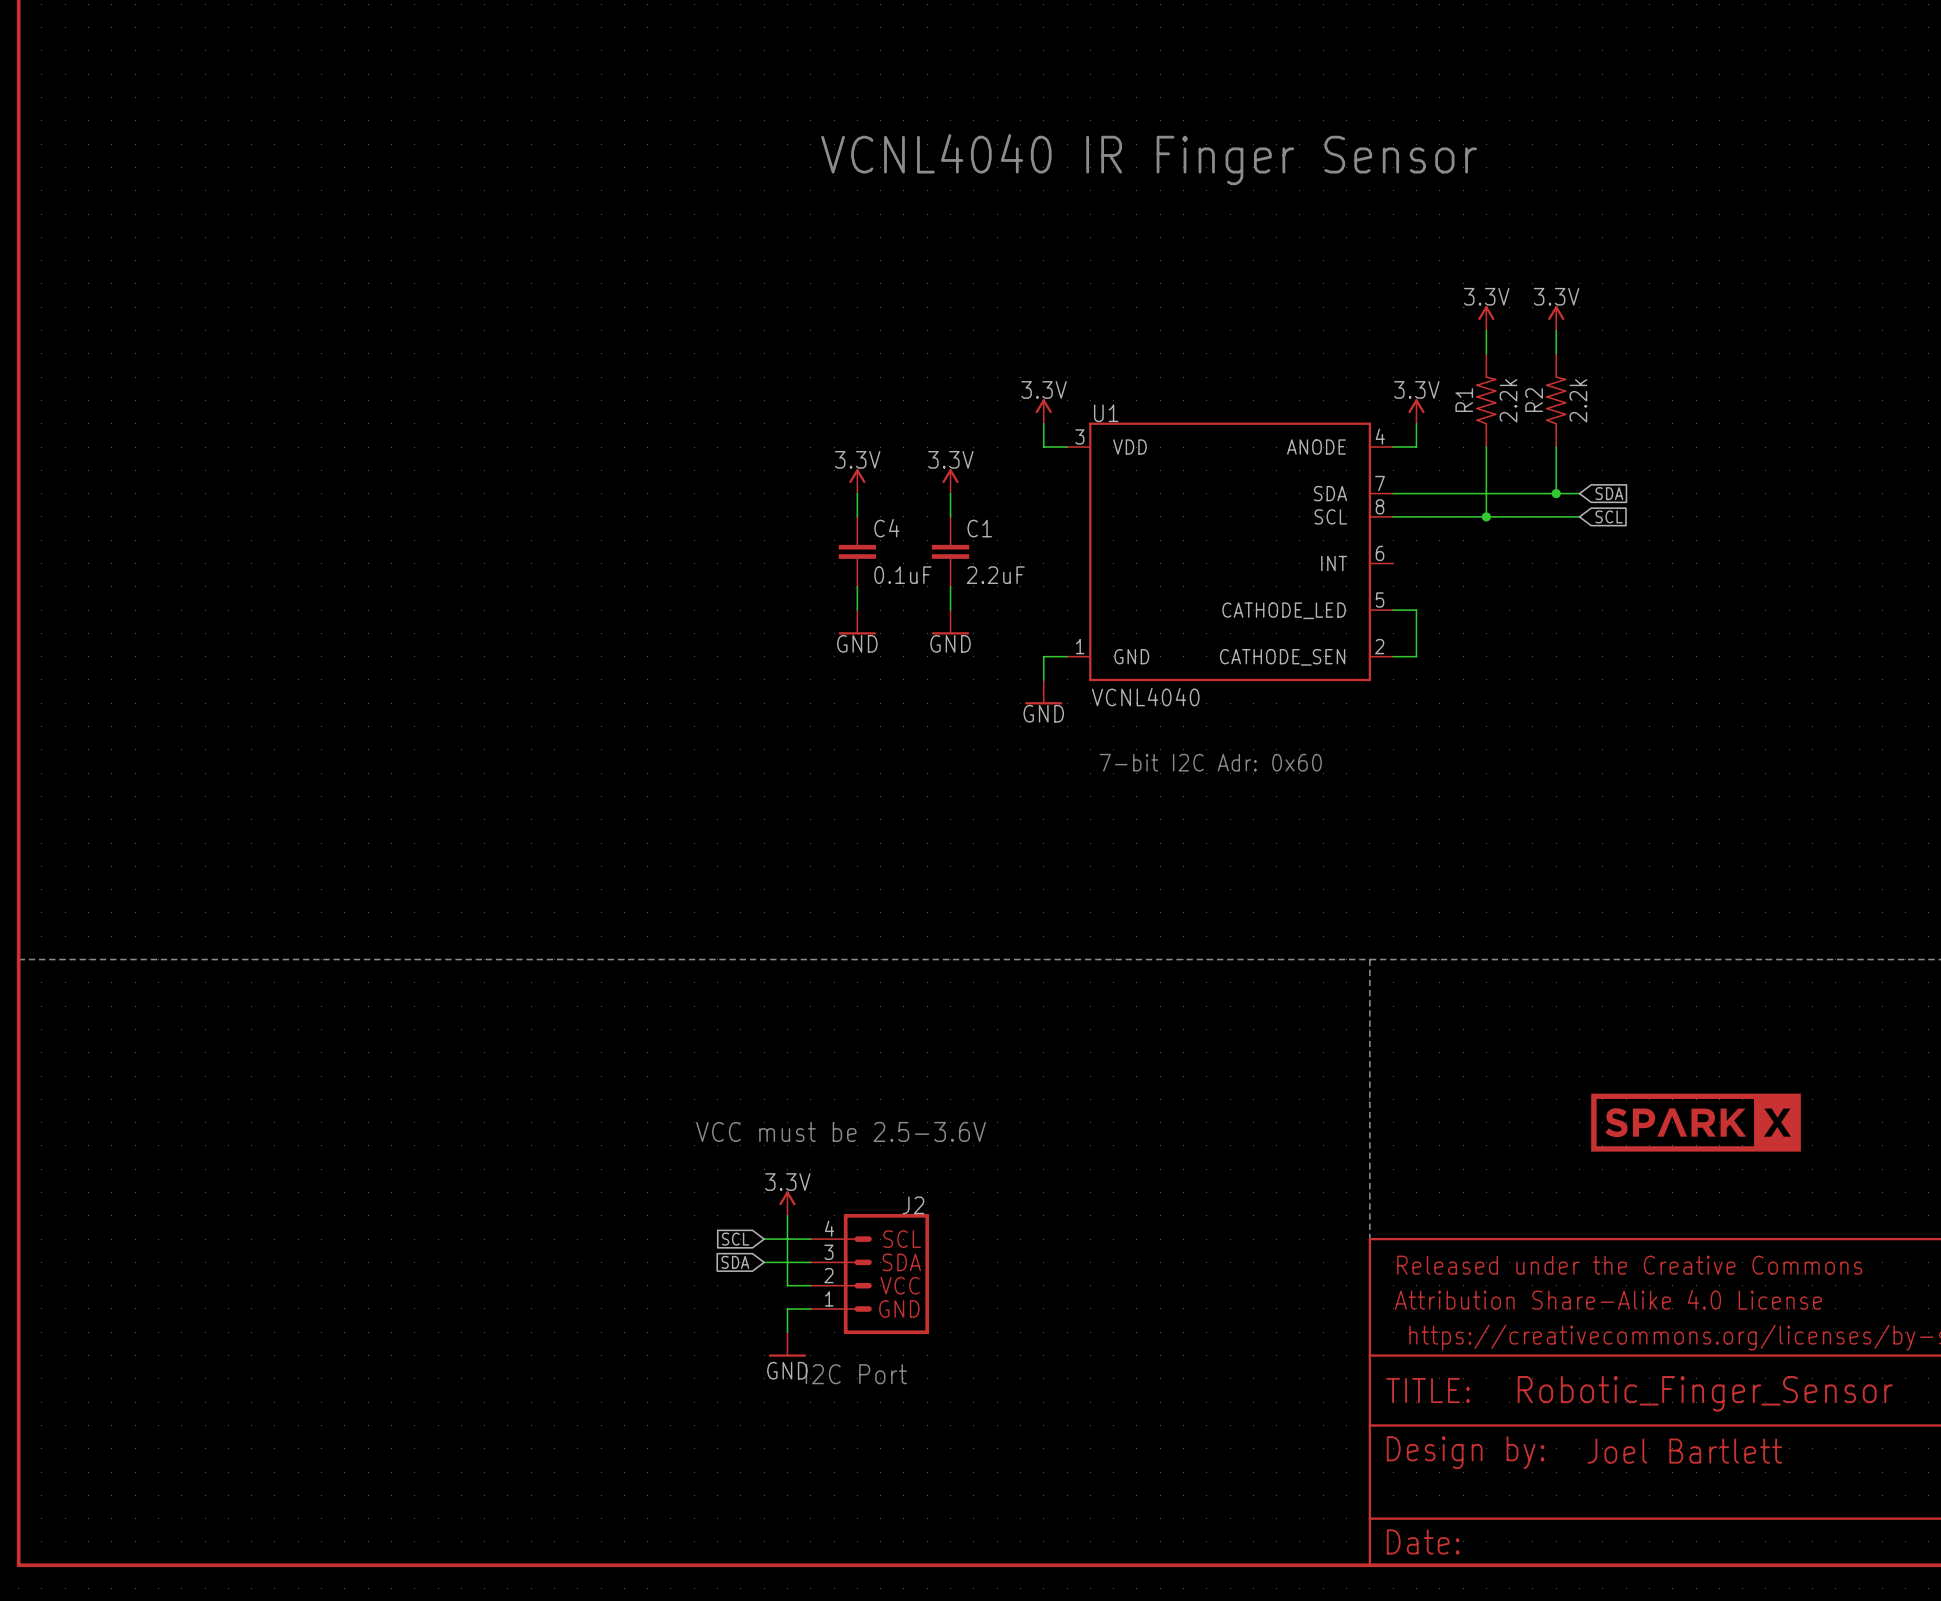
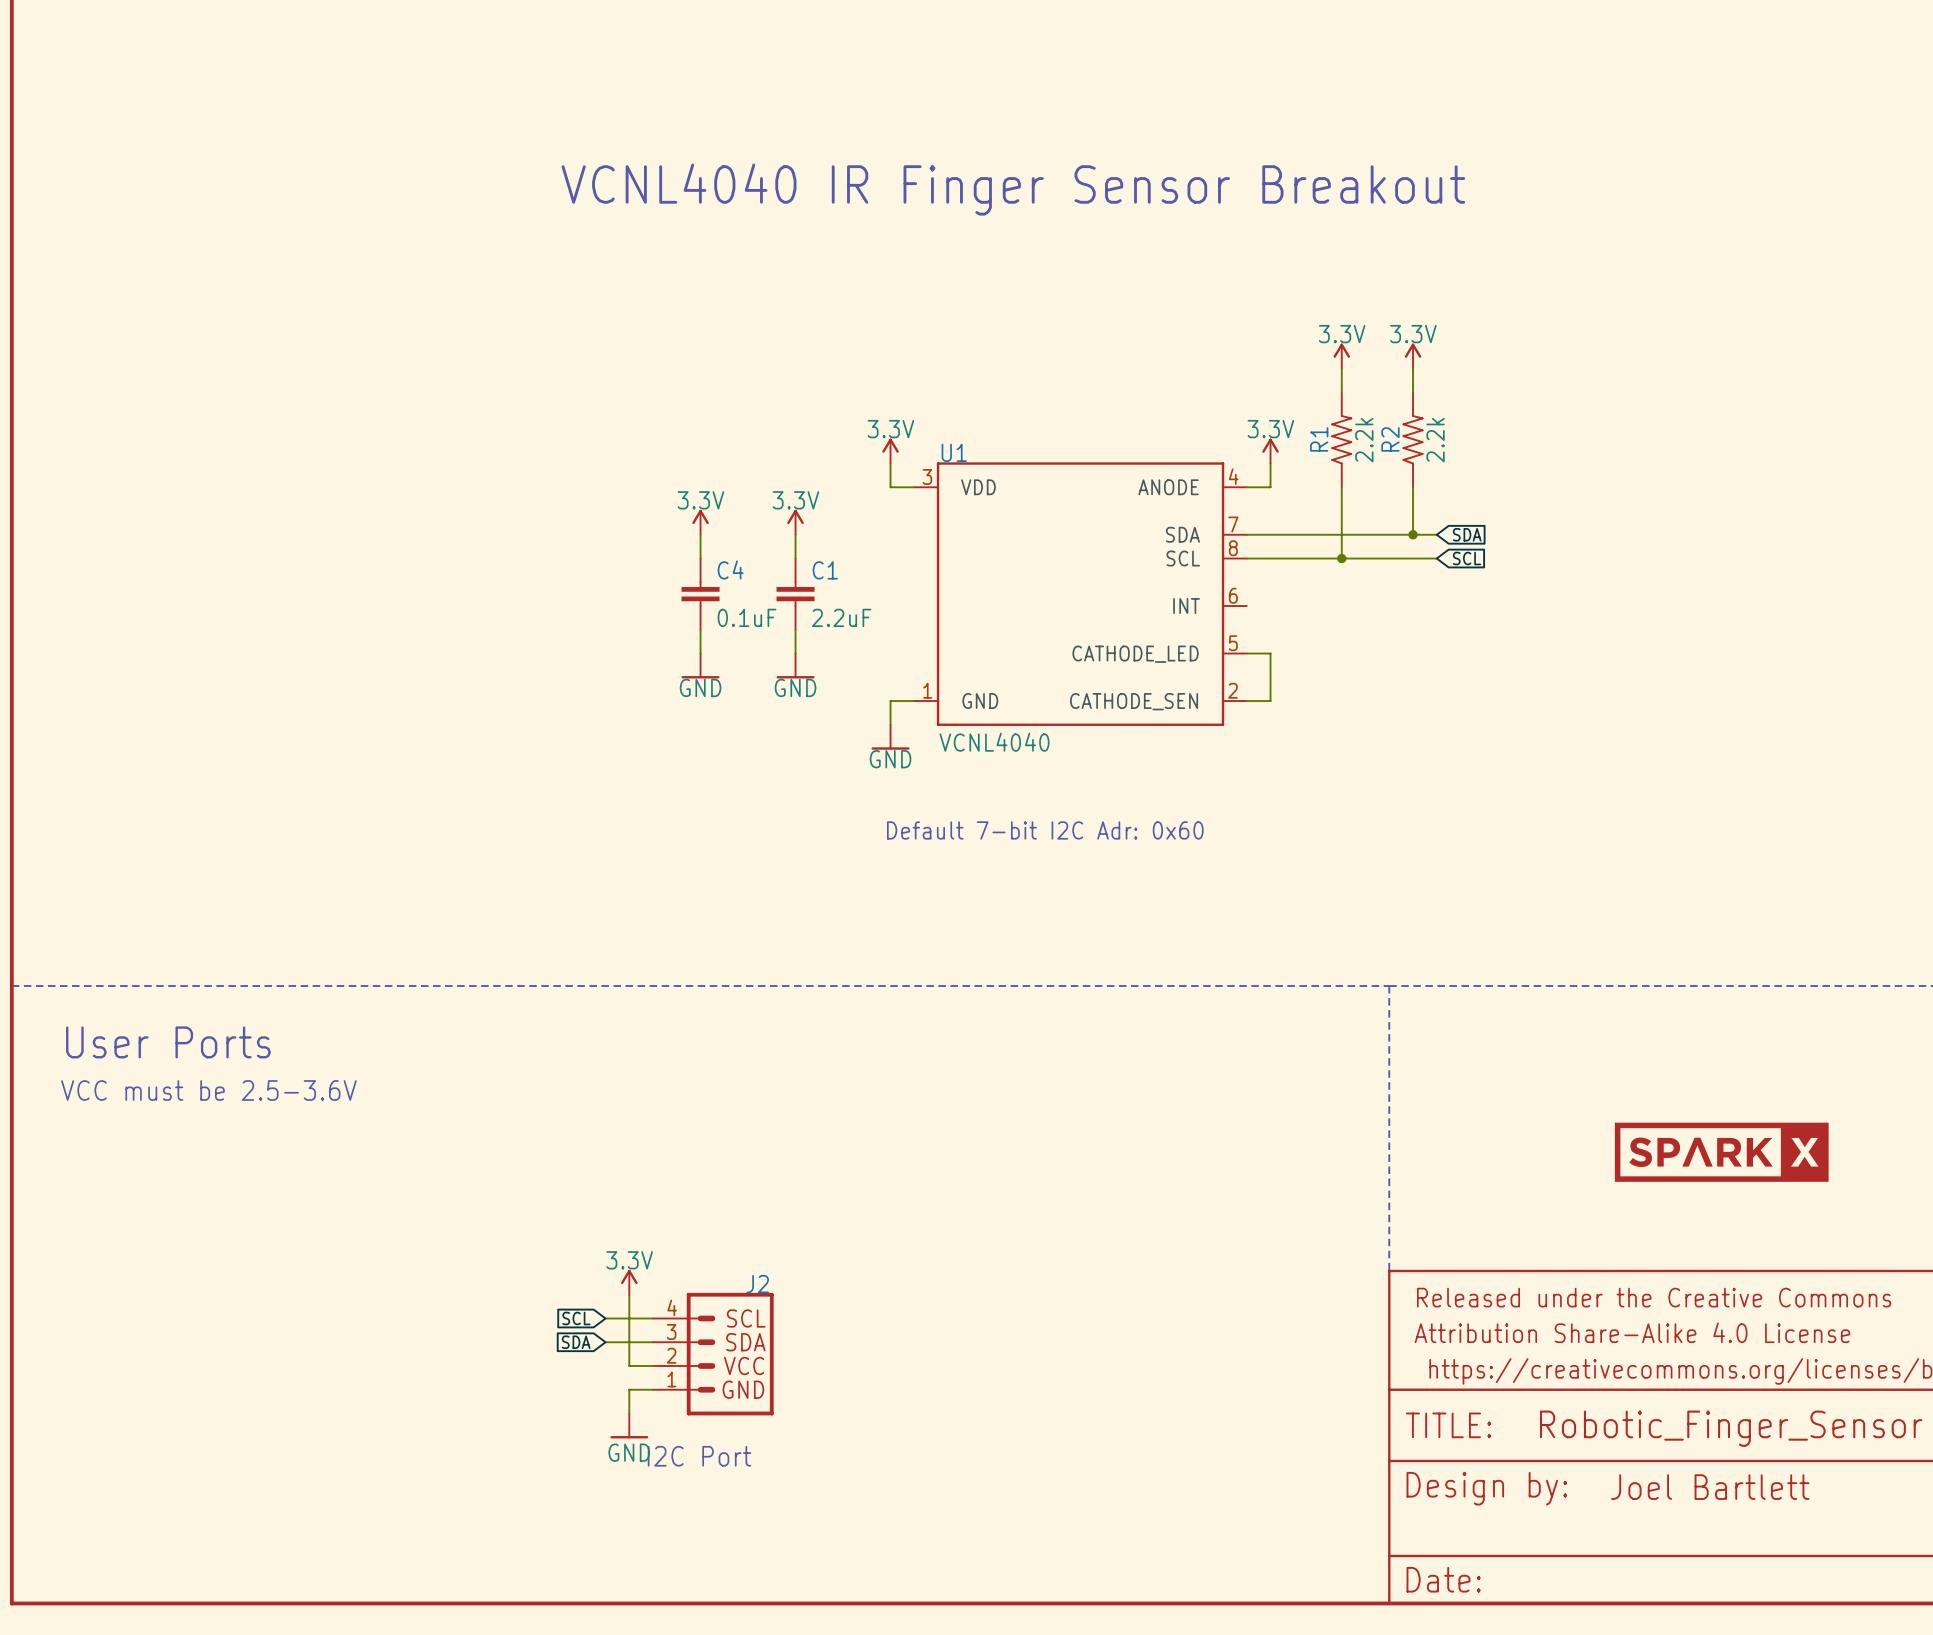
text: VCNL4040 IR Finger Sensor (1149, 159) -> none
text: none -> VCNL4040 IR Finger Sensor Breakout (1013, 189)
power symbol: 3.3V (1486, 318) -> none
power symbol: 3.3V (1556, 318) -> none
wire: (1486, 330) (1486, 353) -> (1341, 368) (1341, 392)
wire: (1556, 330) (1556, 353) -> (1413, 368) (1413, 392)
power symbol: none -> 3.3V (1341, 356)
power symbol: none -> 3.3V (1413, 356)
R1 position: (1486, 400) -> (1341, 439)
R2 position: (1556, 400) -> (1413, 439)
power symbol: 3.3V (1043, 411) -> none
power symbol: 3.3V (1416, 411) -> none
wire: (1043, 423) (1043, 447) (1067, 447) -> (890, 463) (890, 487) (914, 487)
wire: (1416, 423) (1416, 447) (1393, 447) -> (1270, 463) (1270, 487) (1246, 487)
power symbol: none -> 3.3V (890, 451)
power symbol: none -> 3.3V (1270, 451)
wire: (1486, 447) (1486, 516) -> (1341, 487) (1341, 558)
wire: (1556, 447) (1556, 493) -> none
wire: none -> (1413, 487) (1413, 534) (1246, 534)
power symbol: 3.3V (857, 481) -> none
power symbol: 3.3V (950, 481) -> none
wire: (857, 493) (857, 516) -> (700, 534) (700, 558)
wire: (950, 493) (950, 516) -> (795, 534) (795, 558)
wire: (1393, 493) (1579, 493) -> (1246, 558) (1436, 558)
junction: (1556, 493) -> none
global label position: SDA (1609, 493) -> SDA (1467, 534)
power symbol: none -> 3.3V (700, 522)
power symbol: none -> 3.3V (795, 522)
junction: none -> (1413, 534)
wire: (1416, 516) (1579, 516) -> none
junction: (1486, 516) -> none
global label position: SCL (1609, 516) -> SCL (1466, 558)
junction: none -> (1341, 558)
C4 position: (857, 551) -> (700, 594)
C1 position: (950, 551) -> (795, 594)
U1 position: (1230, 551) -> (1080, 594)
wire: (857, 586) (857, 610) -> (700, 629) (700, 653)
wire: (950, 586) (950, 610) -> (795, 629) (795, 653)
wire: (1393, 610) (1416, 610) (1416, 656) (1393, 656) -> (1246, 653) (1270, 653) (1270, 701) (1246, 701)
power symbol: GND (857, 622) -> none
power symbol: GND (950, 622) -> none
power symbol: none -> GND (700, 665)
power symbol: none -> GND (795, 665)
wire: (1067, 656) (1043, 656) (1043, 679) -> (914, 701) (890, 701) (890, 724)
power symbol: GND (1043, 692) -> none
power symbol: none -> GND (890, 737)
text: 7-bit I2C Adr: 0x60 (1210, 762) -> none
text: none -> Default 7-bit I2C Adr: 0x60 (1045, 830)
text: none -> User Ports (168, 1042)
text: none -> VCC must be 2.5-3.6V (208, 1090)
text: VCC must be 2.5-3.6V (841, 1131) -> none
power symbol position: 3.3V (787, 1203) -> 3.3V (629, 1282)
wire: (787, 1215) (787, 1285) (810, 1285) -> (629, 1294) (629, 1365) (653, 1365)
global label position: SCL (735, 1239) -> SCL (576, 1318)
wire: (764, 1239) (810, 1239) -> (605, 1342) (653, 1342)
global label position: SDA (735, 1262) -> SDA (576, 1342)
wire: (764, 1262) (810, 1262) -> (605, 1318) (653, 1318)
J2 position: (869, 1274) -> (713, 1354)
wire: (810, 1308) (787, 1308) (787, 1332) -> (653, 1389) (629, 1389) (629, 1413)
power symbol position: GND (787, 1344) -> GND (629, 1425)
text position: I2C Port (856, 1374) -> I2C Port (699, 1456)

